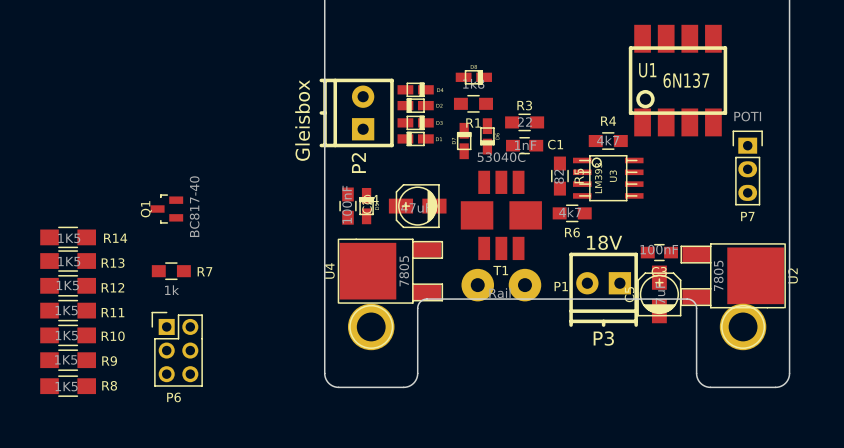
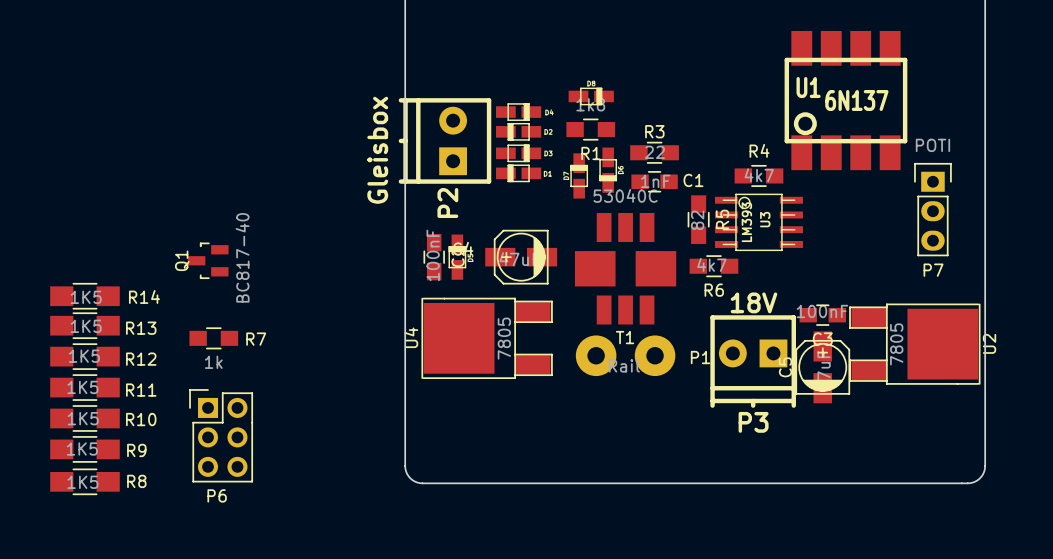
part: (371, 326) -> none
part: (743, 326) -> none
board edge: (403, 387) (412, 384) (417, 377) (417, 307) (420, 301) (427, 299) (689, 299) (694, 302) (696, 307) (697, 377) (702, 384) (710, 387) -> (503, 483) (886, 483)

